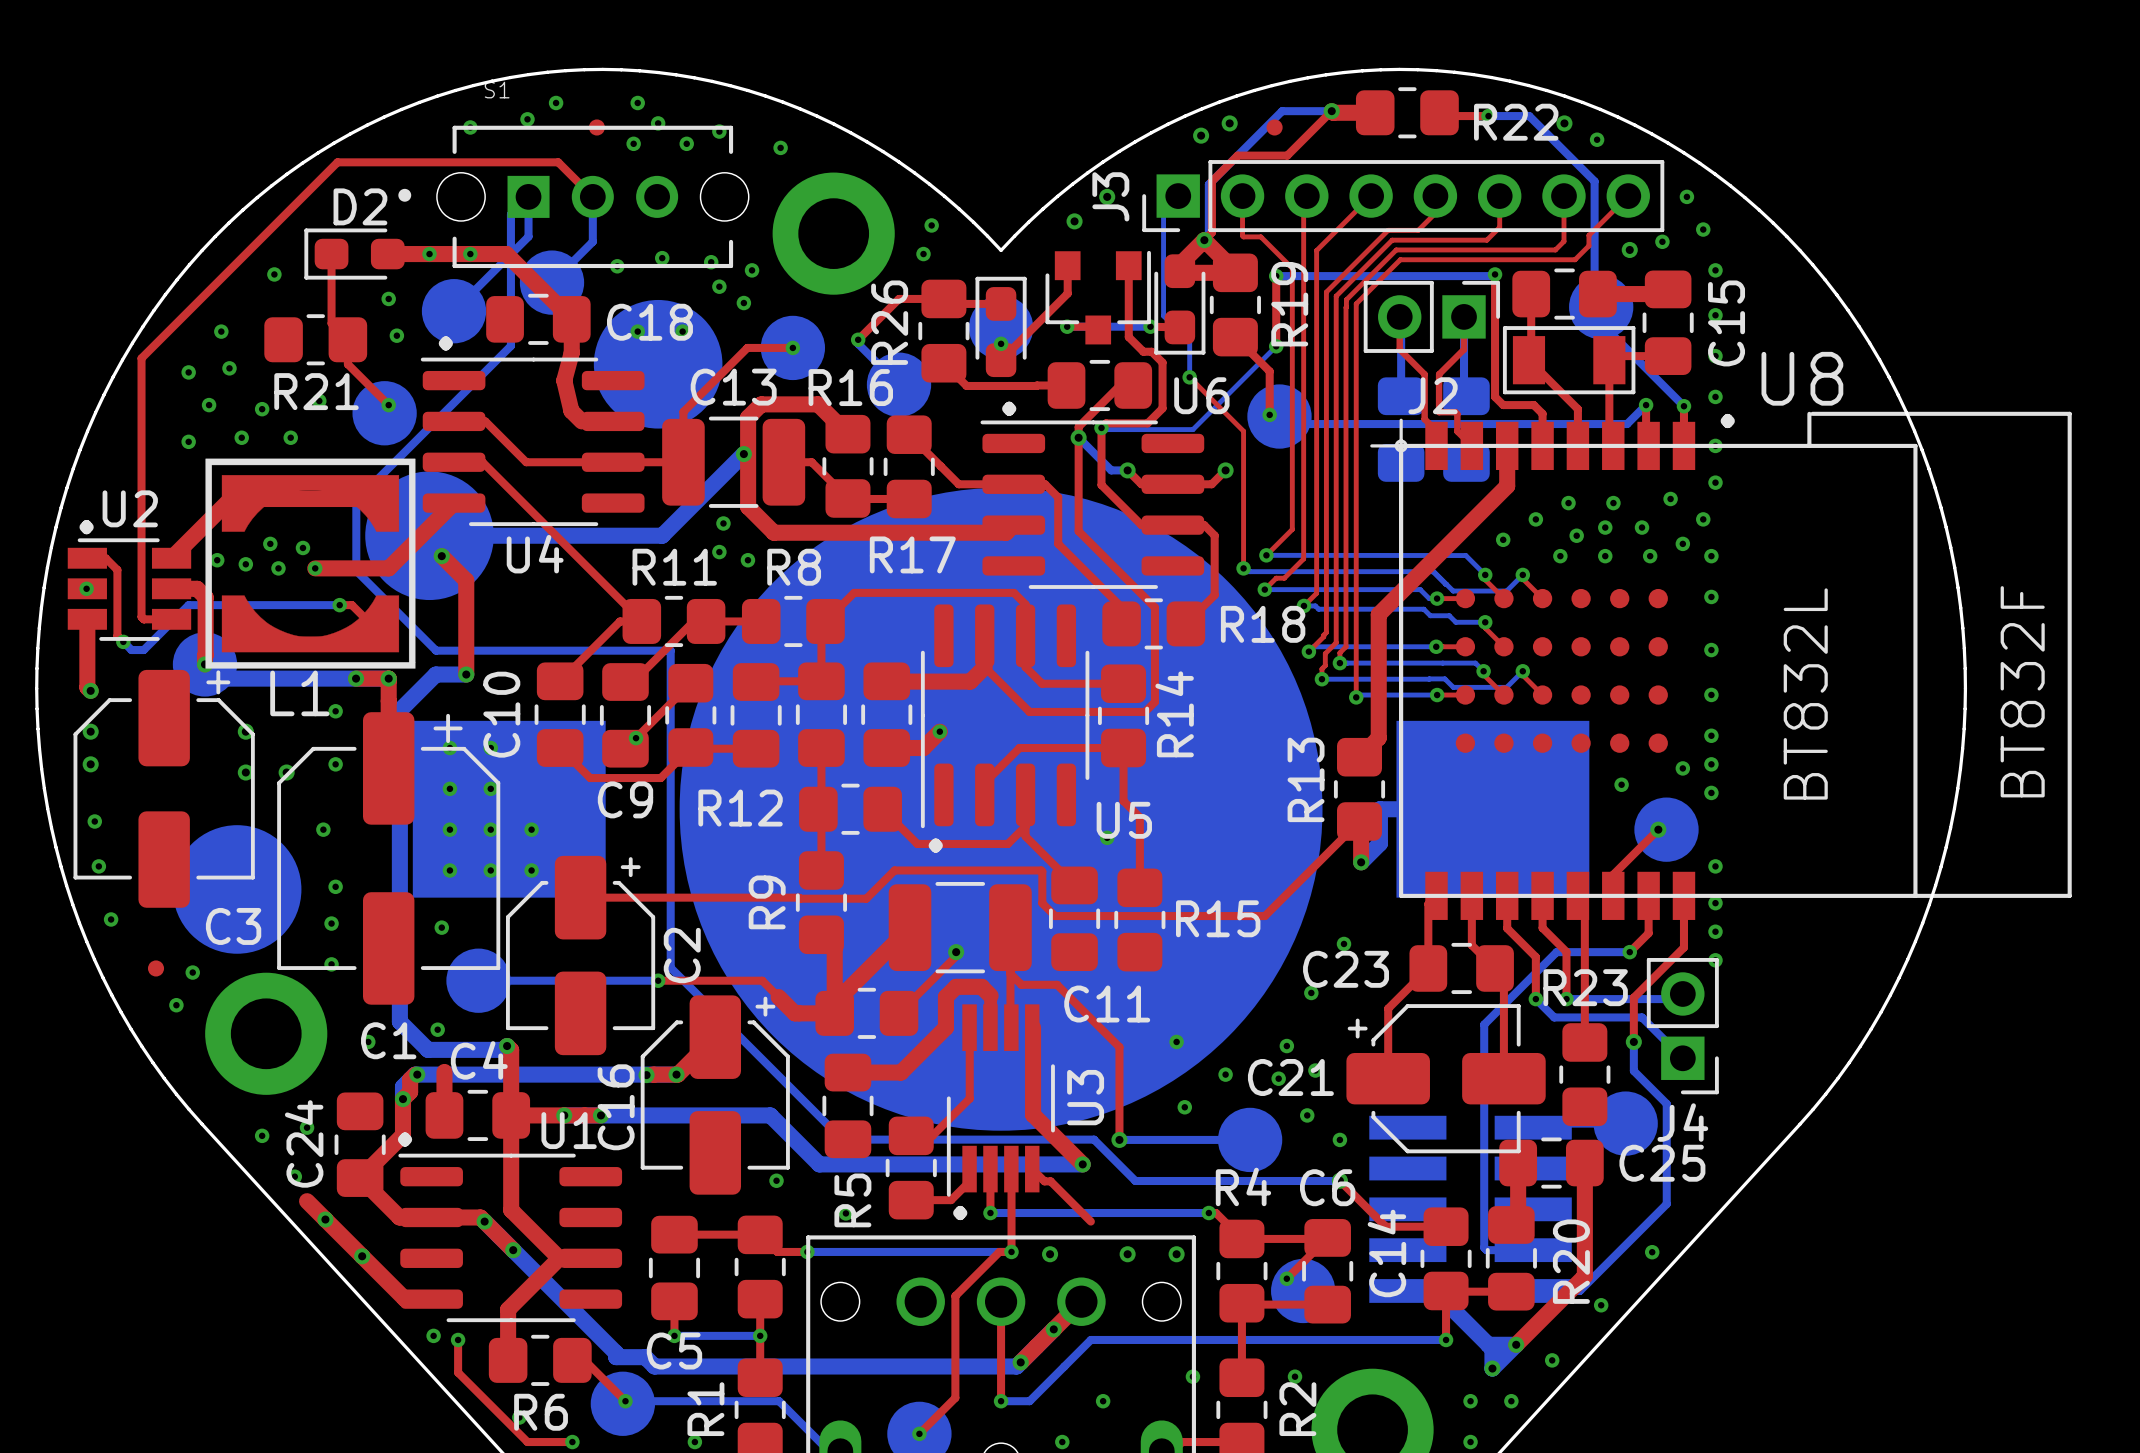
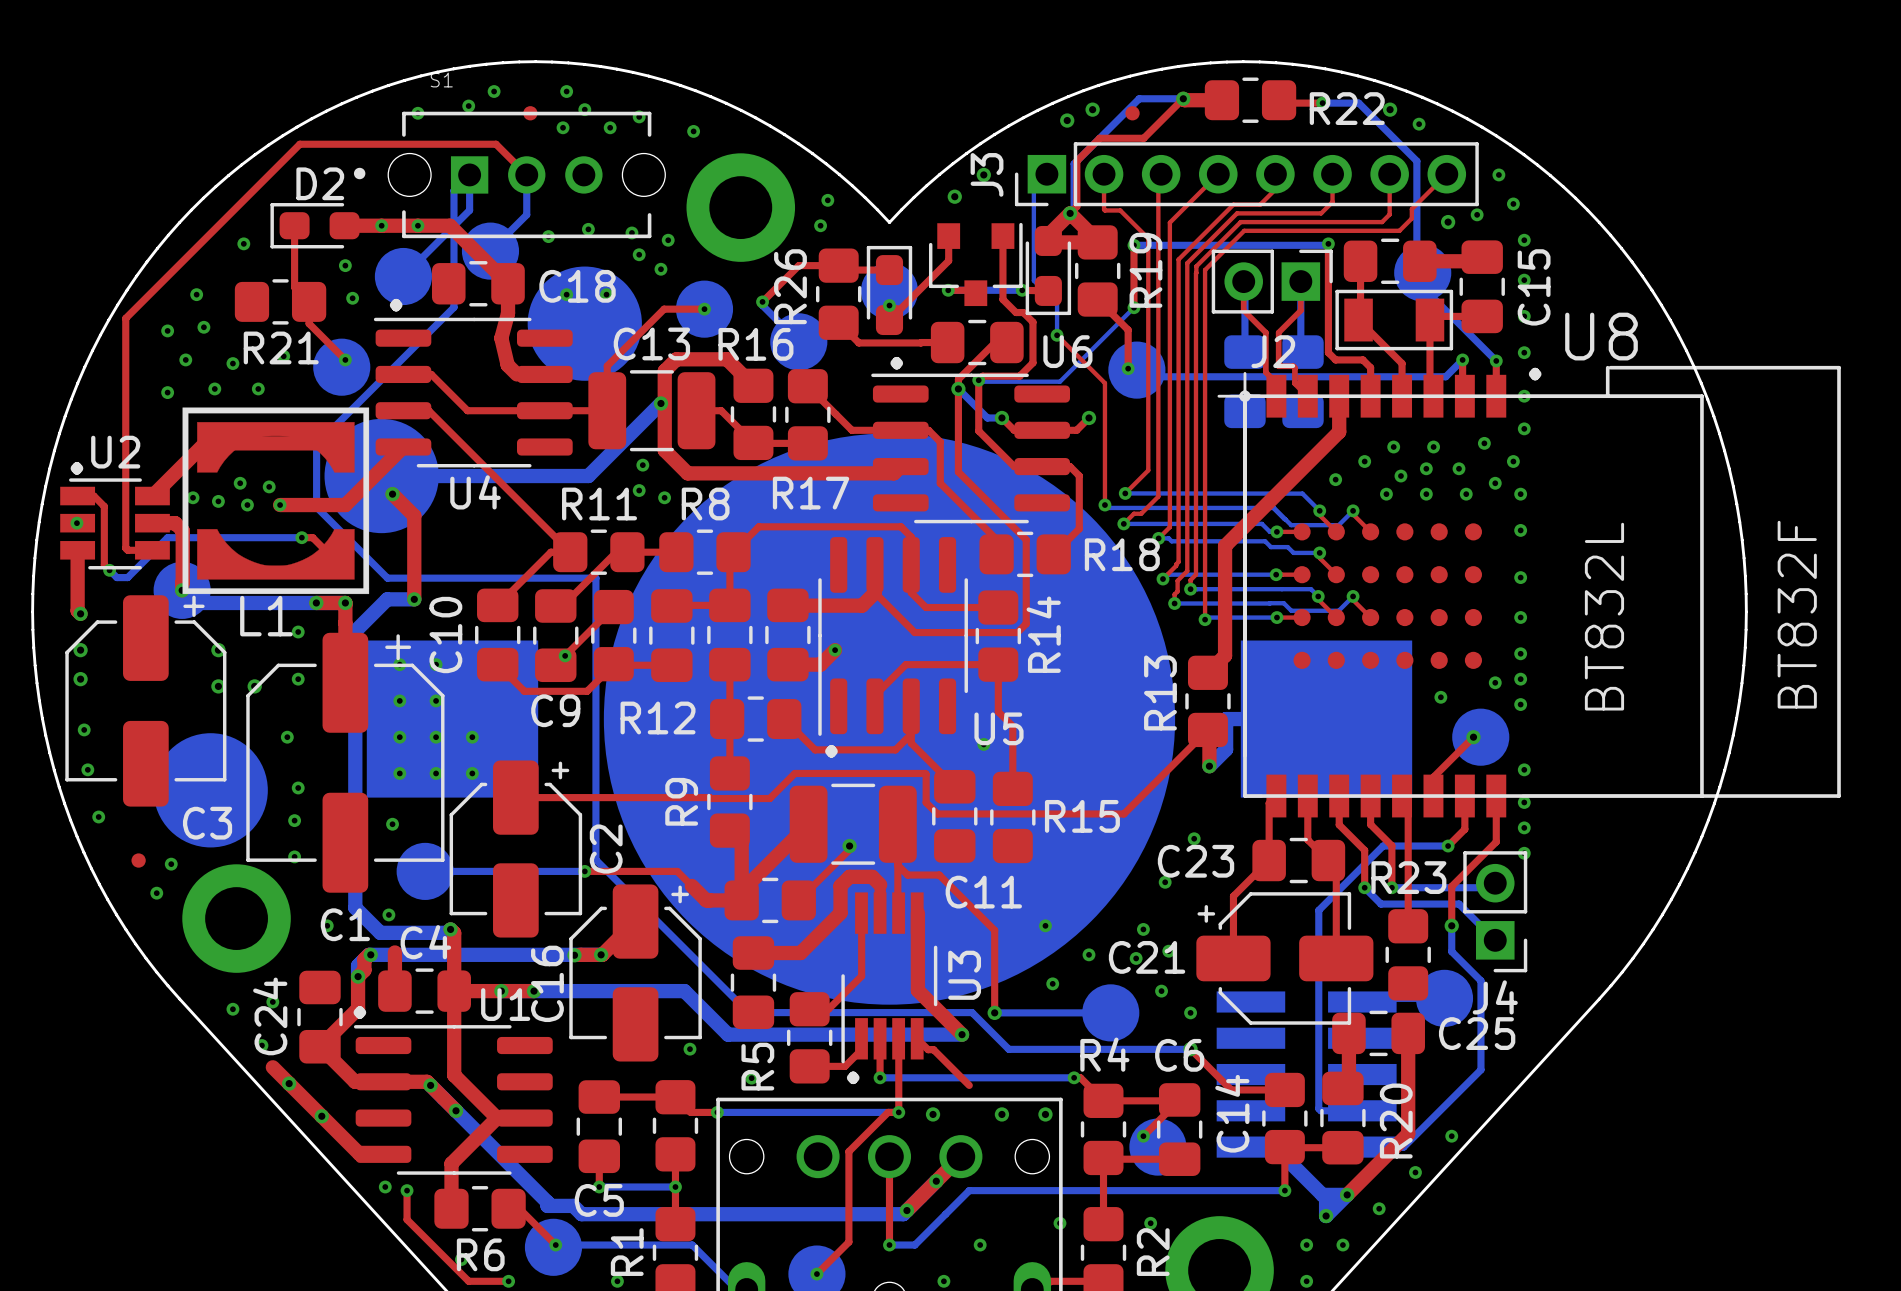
via: (1652, 1252) -> none
via: none -> (1451, 1136)
via position: (1601, 1305) -> (1415, 1172)

